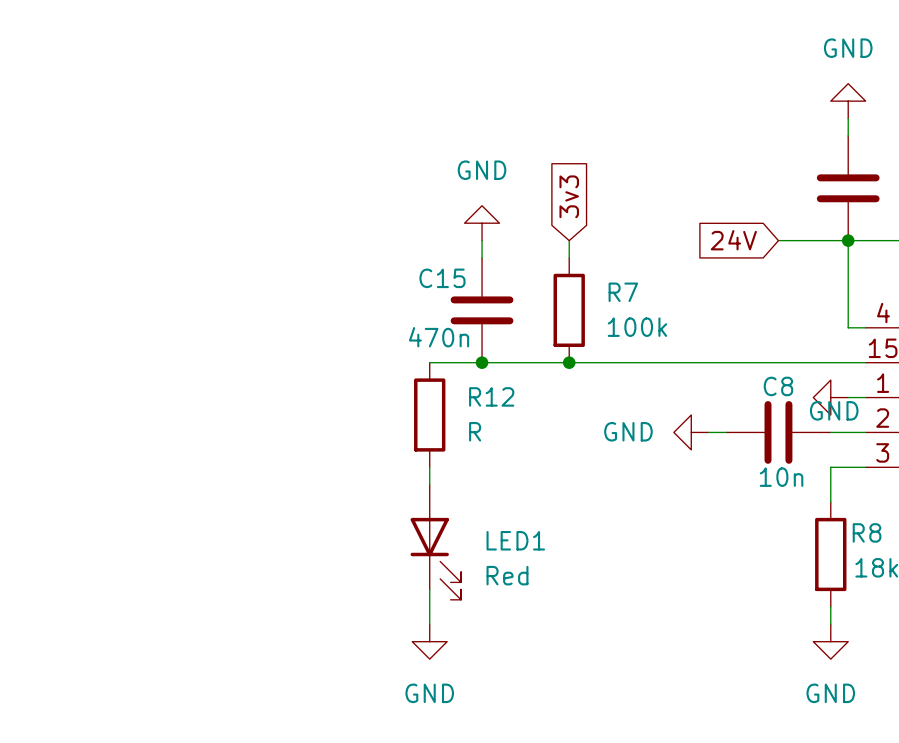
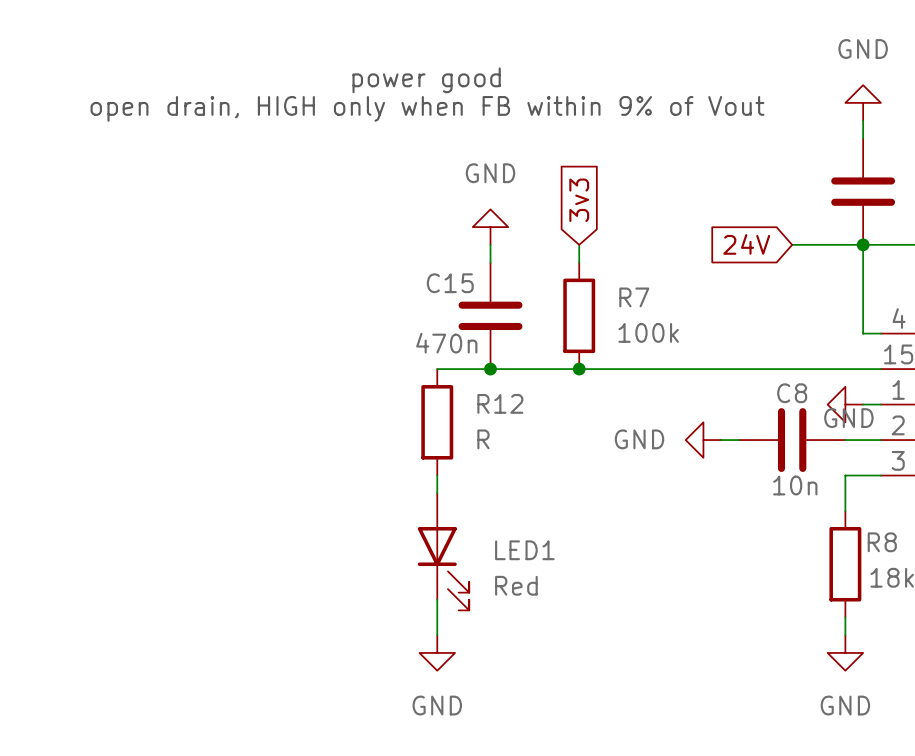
text: none -> power good (426, 80)
text: none -> open drain, HIGH only when FB within 9% of Vout (427, 108)

